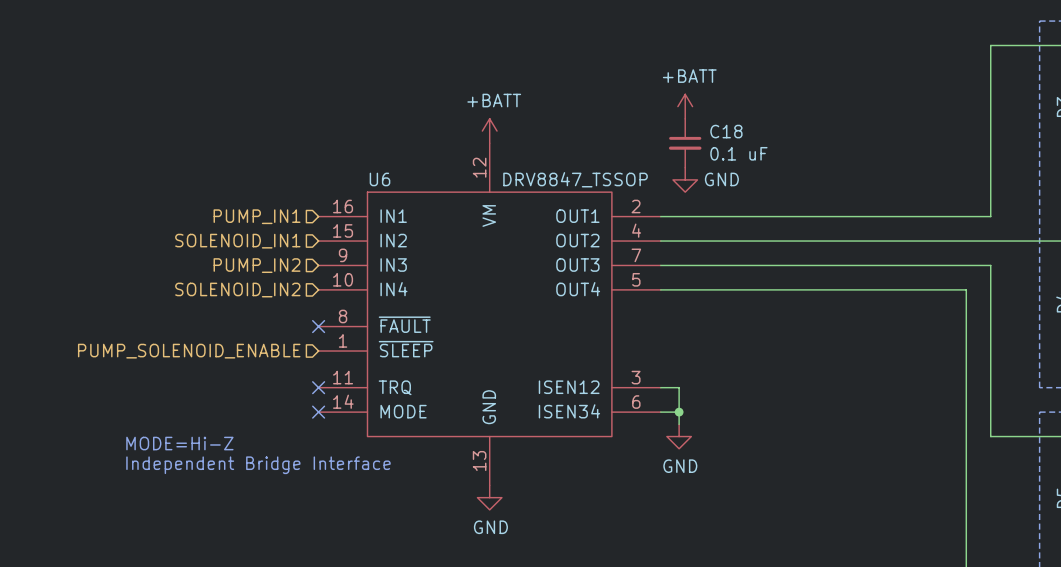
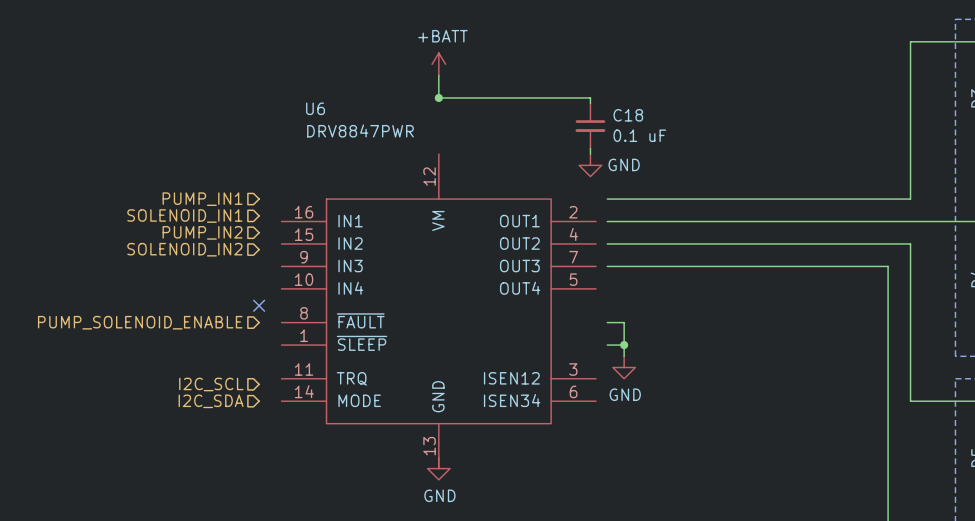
wire: none -> (438, 75) (438, 97) (590, 97) (590, 103)
junction: none -> (438, 97)
power symbol: +BATT (685, 106) -> none
power symbol position: +BATT (489, 131) -> +BATT (438, 64)
C18 position: (685, 143) -> (590, 126)
wire: none -> (590, 148) (590, 154)
U6 name position: U6 (380, 179) -> U6 (315, 108)
U6 value: DRV8847_TSSOP (575, 179) -> DRV8847PWR (360, 130)
power symbol position: GND (685, 179) -> GND (590, 165)
hierarchical label position: PUMP_IN1 (257, 216) -> PUMP_IN1 (202, 199)
hierarchical label position: SOLENOID_IN1 (237, 241) -> SOLENOID_IN1 (184, 216)
hierarchical label position: PUMP_IN2 (257, 265) -> PUMP_IN2 (202, 232)
hierarchical label position: SOLENOID_IN2 (237, 290) -> SOLENOID_IN2 (184, 249)
U6 position: (489, 314) -> (438, 311)
no-connect mark: (318, 326) -> none
no-connect mark: none -> (259, 305)
hierarchical label position: PUMP_SOLENOID_ENABLE (189, 351) -> PUMP_SOLENOID_ENABLE (140, 322)
no-connect mark: (318, 387) -> none
wire: (660, 387) (679, 387) (679, 424) -> (607, 322) (624, 322) (624, 356)
no-connect mark: (318, 412) -> none
wire: (660, 412) (679, 412) -> (607, 345) (624, 345)
junction position: (679, 412) -> (624, 345)
hierarchical label: none -> I2C_SCL (211, 384)
hierarchical label: none -> I2C_SDA (211, 401)
power symbol position: GND (679, 436) -> GND (624, 367)
text: MODE=Hi-Z (179, 443) -> none
text: Independent Bridge Interface (258, 465) -> none
power symbol position: GND (489, 497) -> GND (438, 468)

